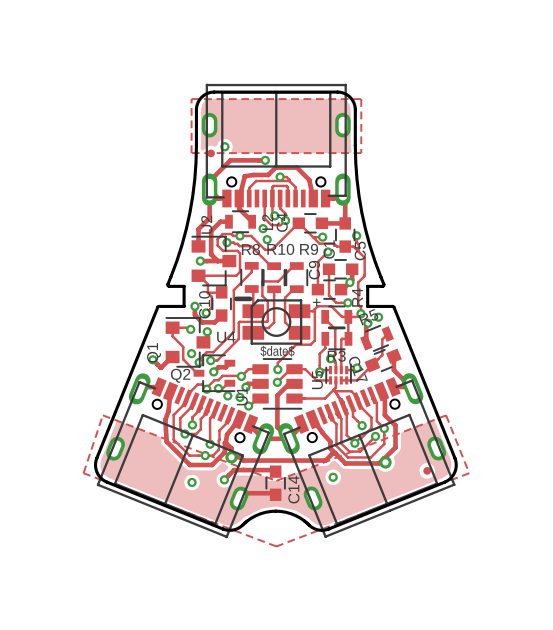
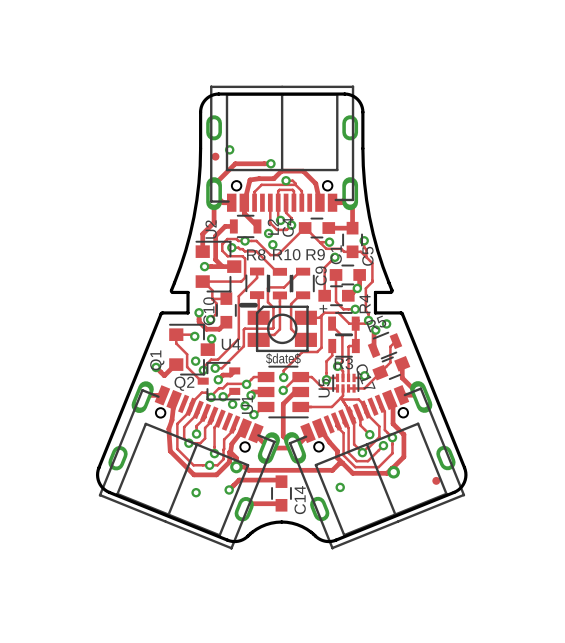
zone outline: (191, 99) (361, 99) (361, 153) (191, 153) (191, 99) -> none
zone outline: (102, 415) (276, 480) (446, 415) (469, 473) (276, 546) (83, 473) (102, 415) -> none

